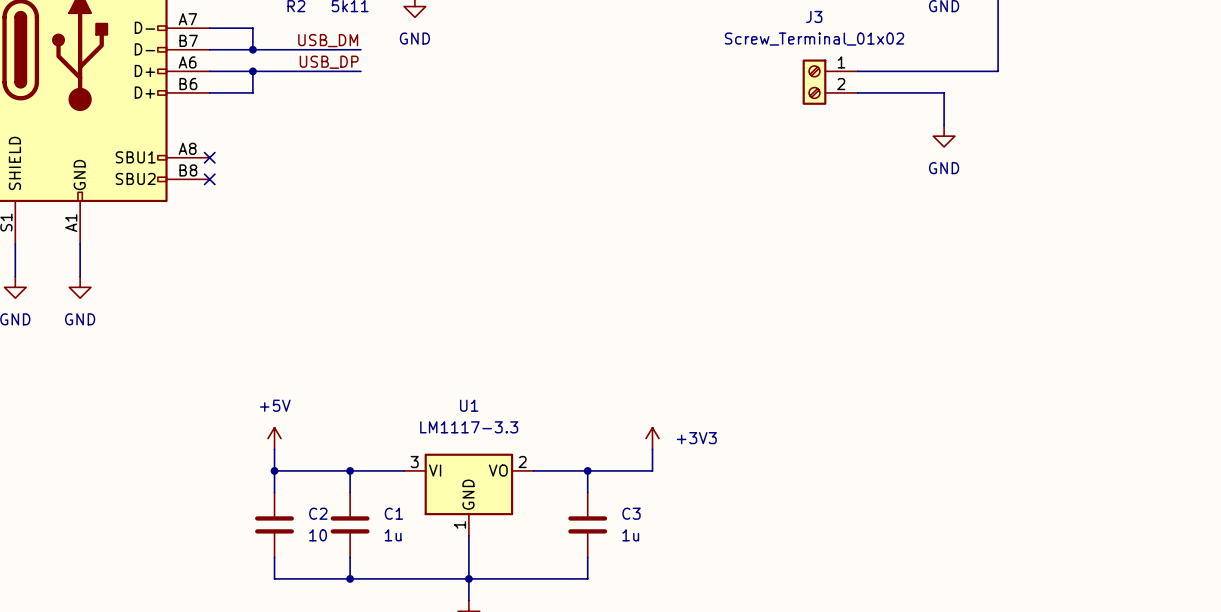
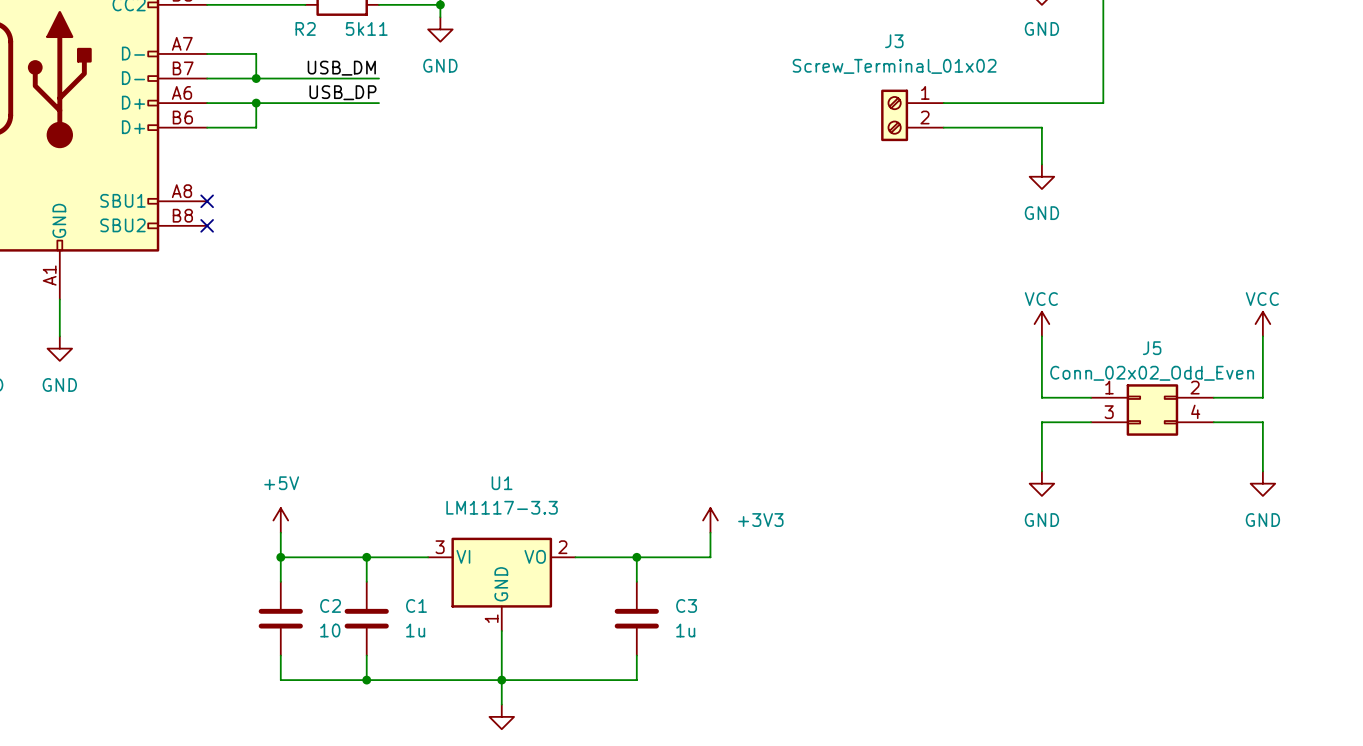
power symbol: none -> VCC (1041, 324)
power symbol: none -> VCC (1262, 324)
wire: none -> (1041, 336) (1041, 397) (1091, 397)
wire: none -> (1262, 336) (1262, 397) (1213, 397)
J5: none -> Conn_02x02_Odd_Even (1152, 410)
wire: none -> (1091, 422) (1041, 422) (1041, 471)
wire: none -> (1213, 422) (1262, 422) (1262, 471)
power symbol: none -> GND (1041, 483)
power symbol: none -> GND (1262, 483)

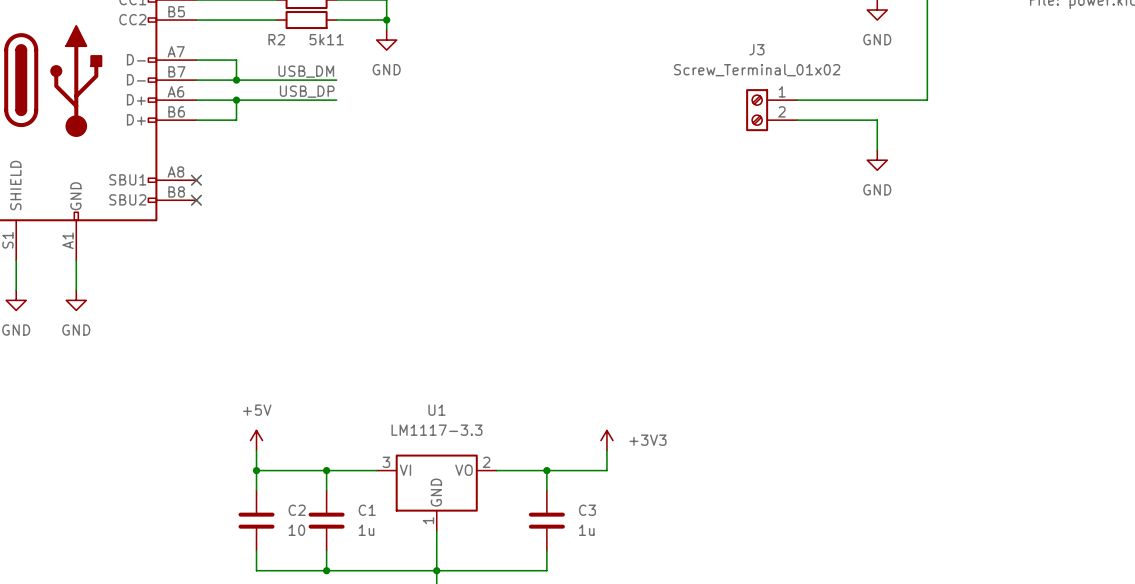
power symbol: VCC (1041, 324) -> none
power symbol: VCC (1262, 324) -> none
wire: (1041, 336) (1041, 397) (1091, 397) -> none
wire: (1262, 336) (1262, 397) (1213, 397) -> none
J5: Conn_02x02_Odd_Even (1152, 410) -> none
wire: (1091, 422) (1041, 422) (1041, 471) -> none
wire: (1213, 422) (1262, 422) (1262, 471) -> none
power symbol: GND (1041, 483) -> none
power symbol: GND (1262, 483) -> none

